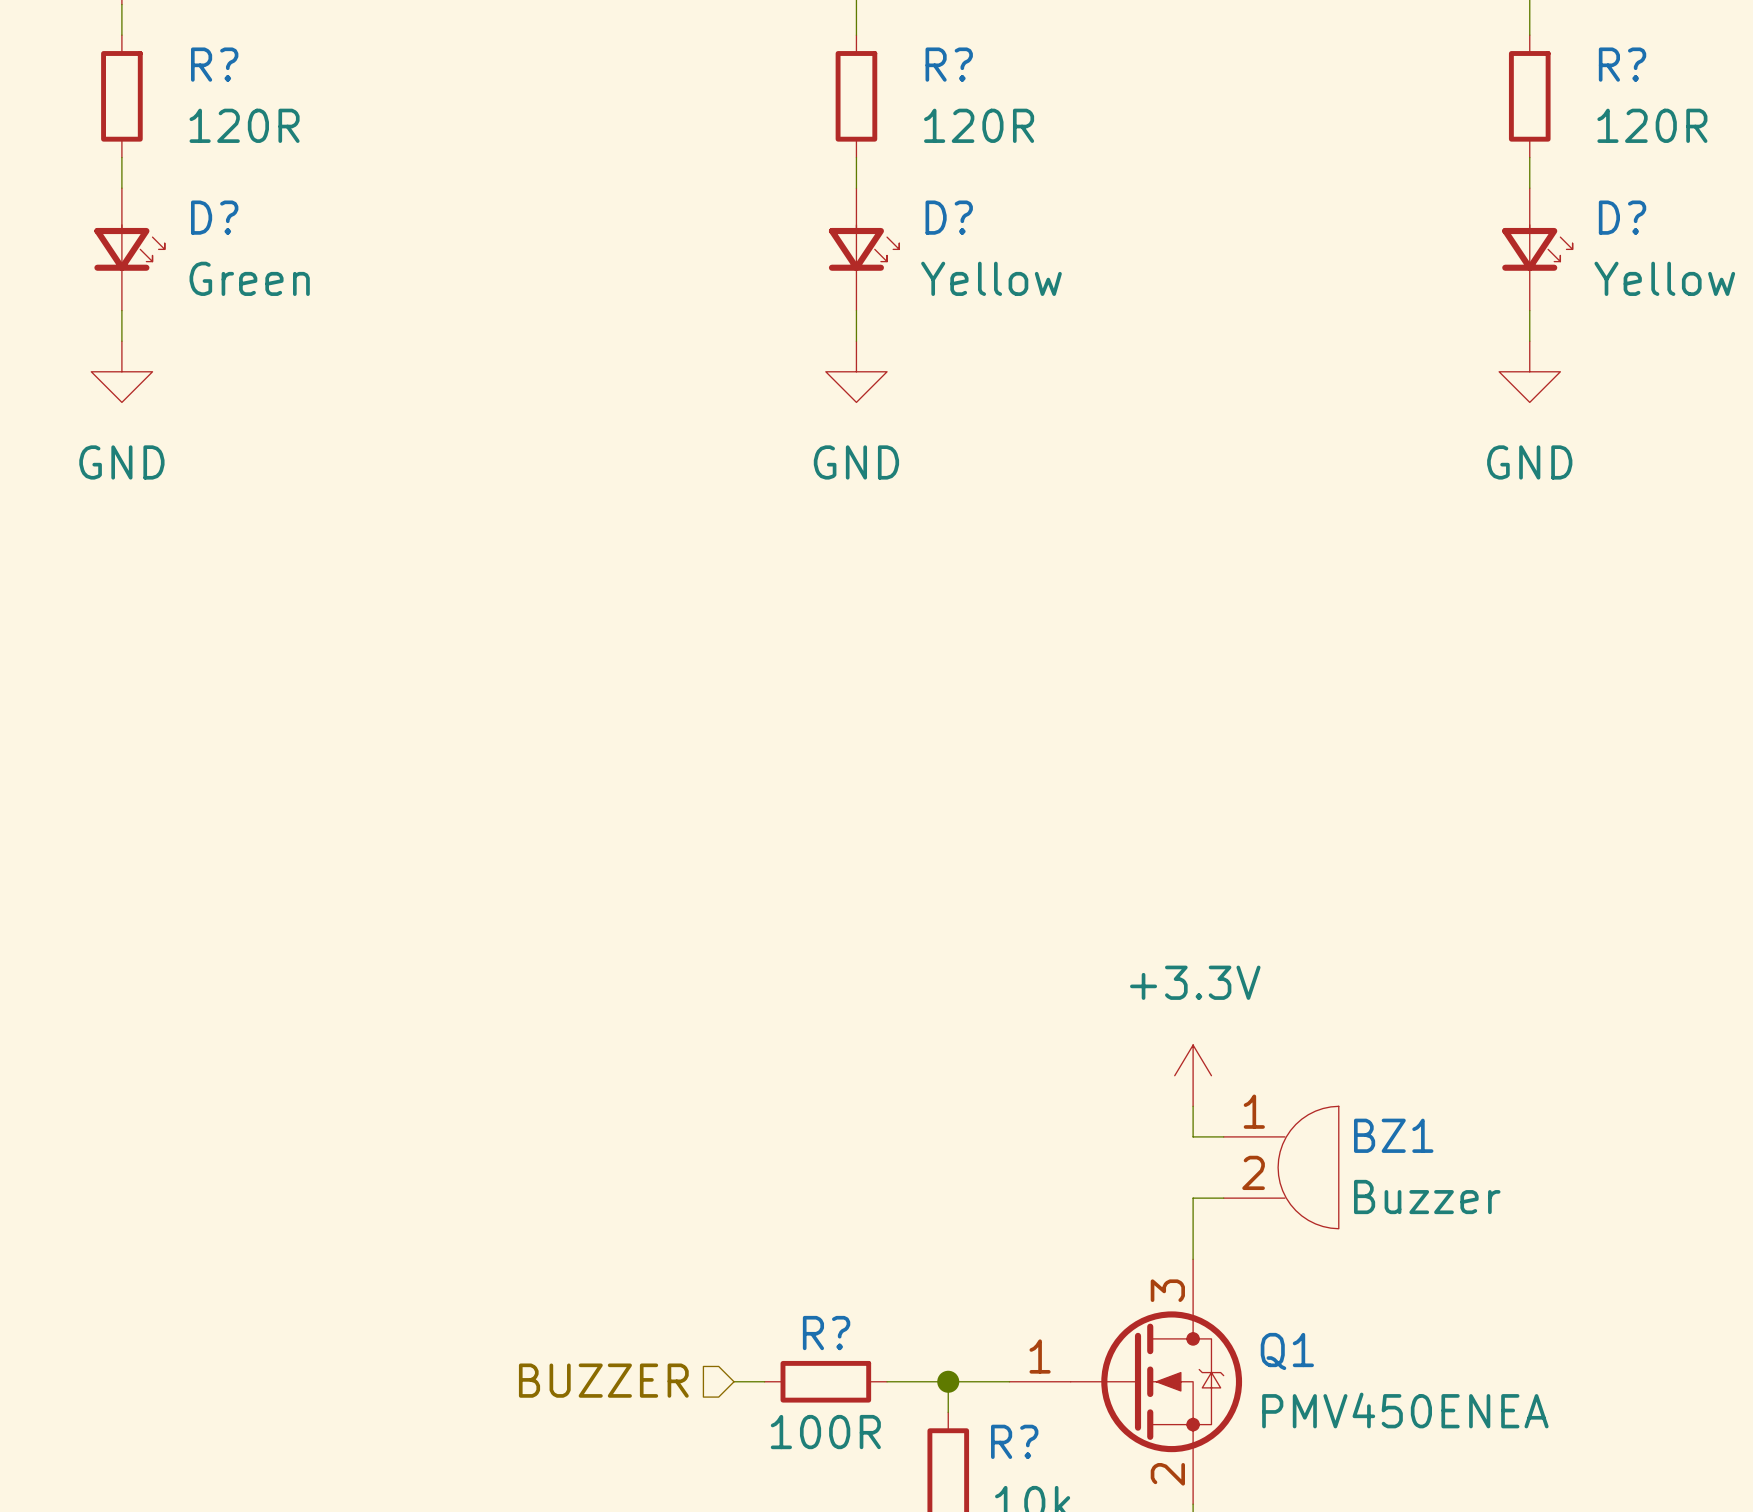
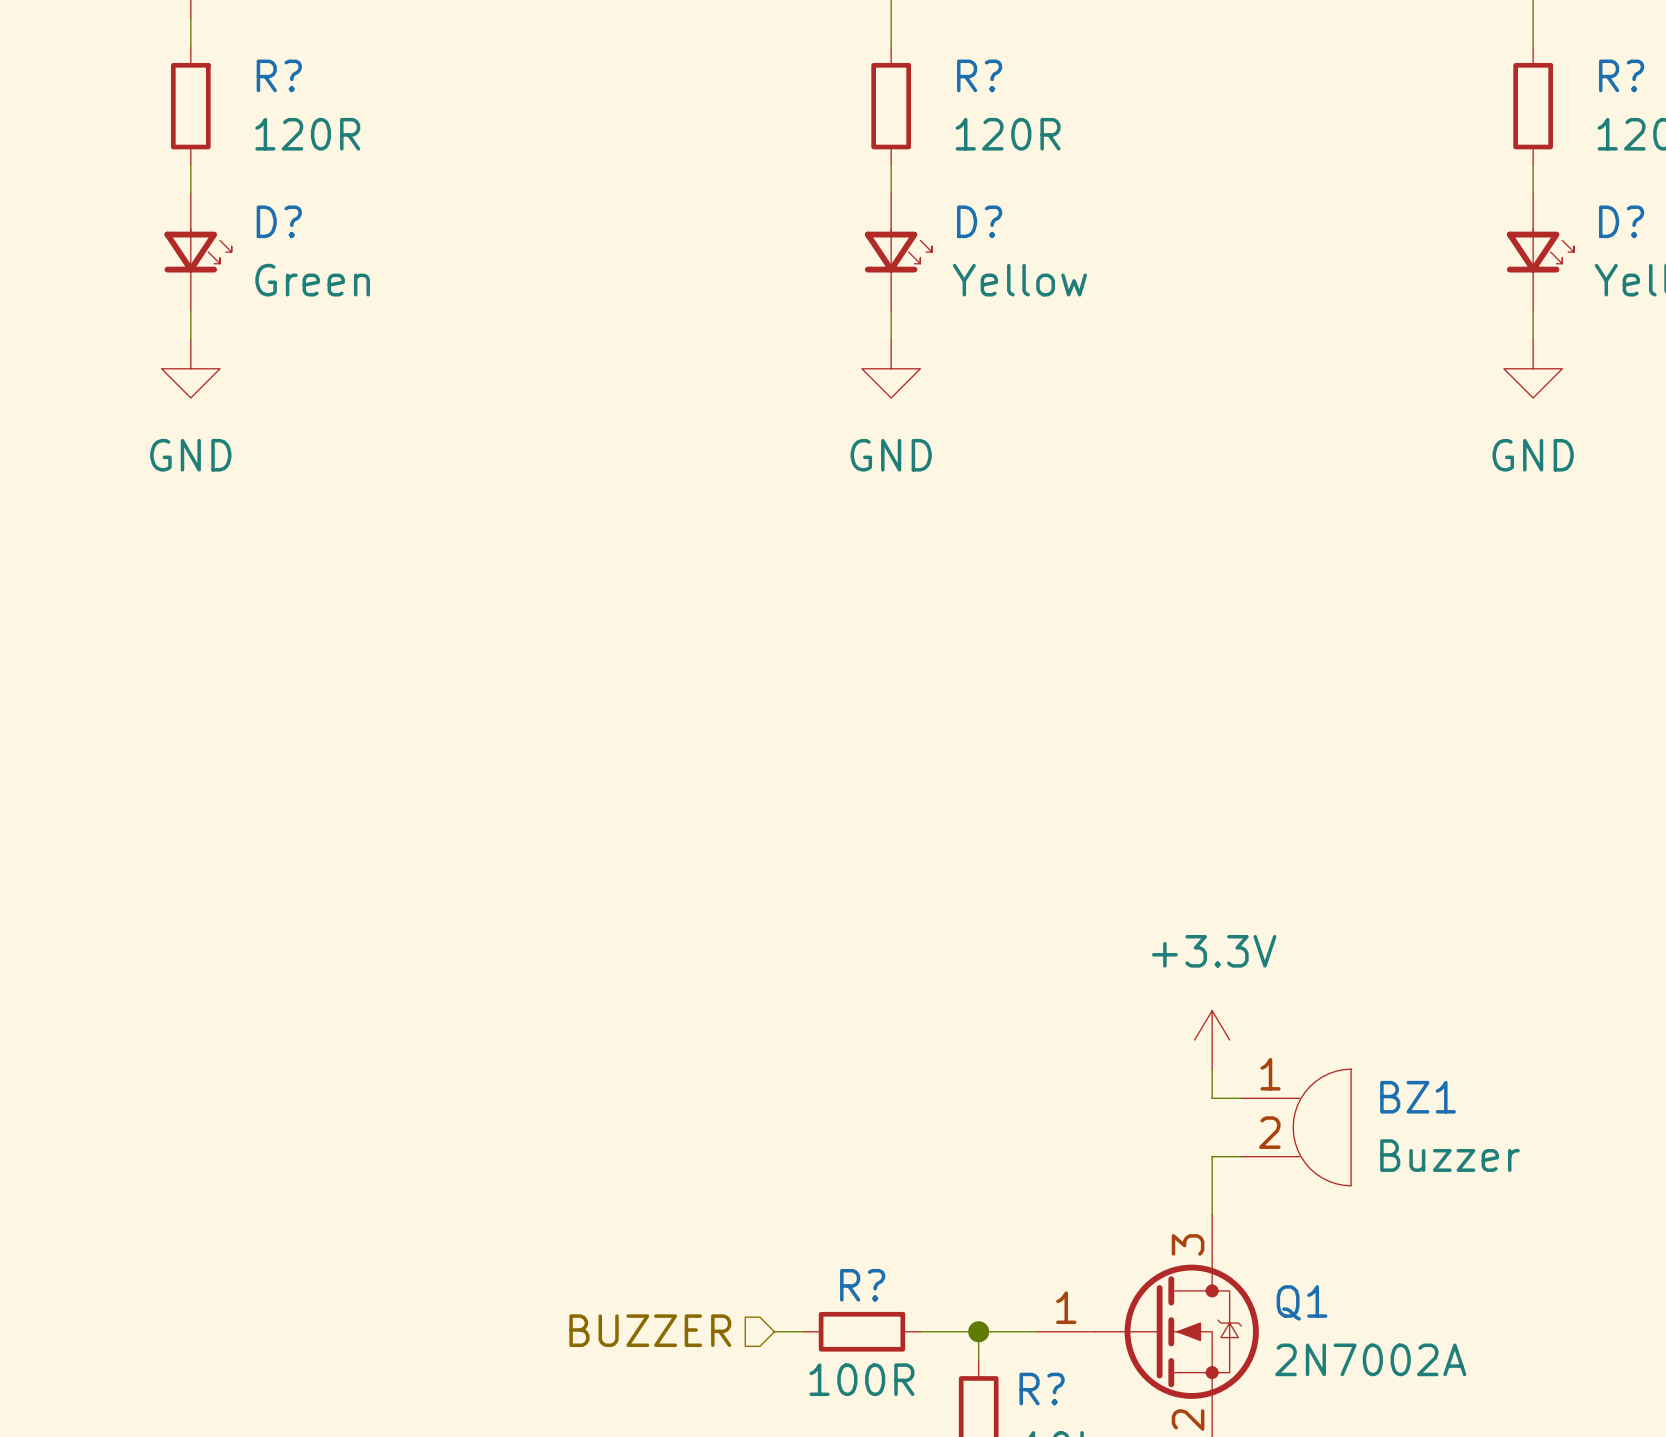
BZ1 name position: BZ1 (1393, 1135) -> BZ1 (1418, 1097)
BZ1 value position: Buzzer (1427, 1196) -> Buzzer (1449, 1155)
Q1 value: PMV450ENEA (1405, 1410) -> 2N7002A (1370, 1359)

